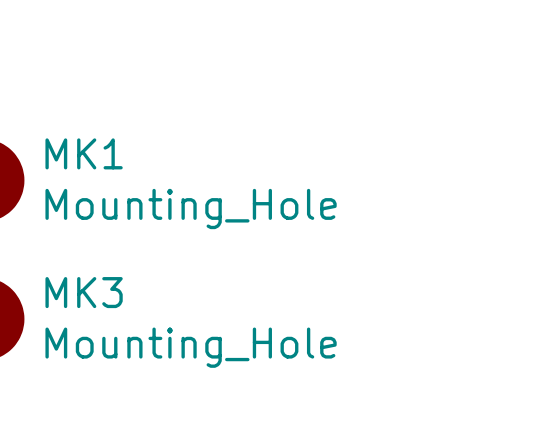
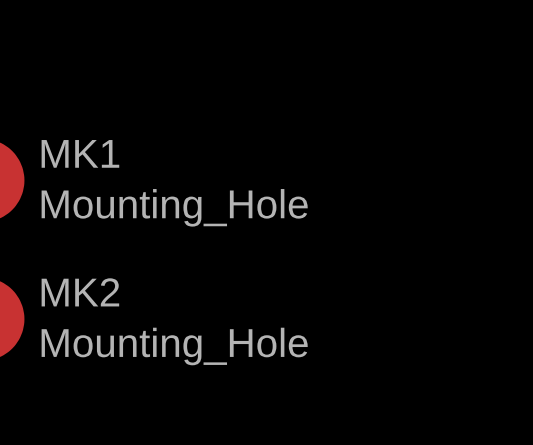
MK3 name: MK3 (84, 292) -> MK2 (80, 292)

